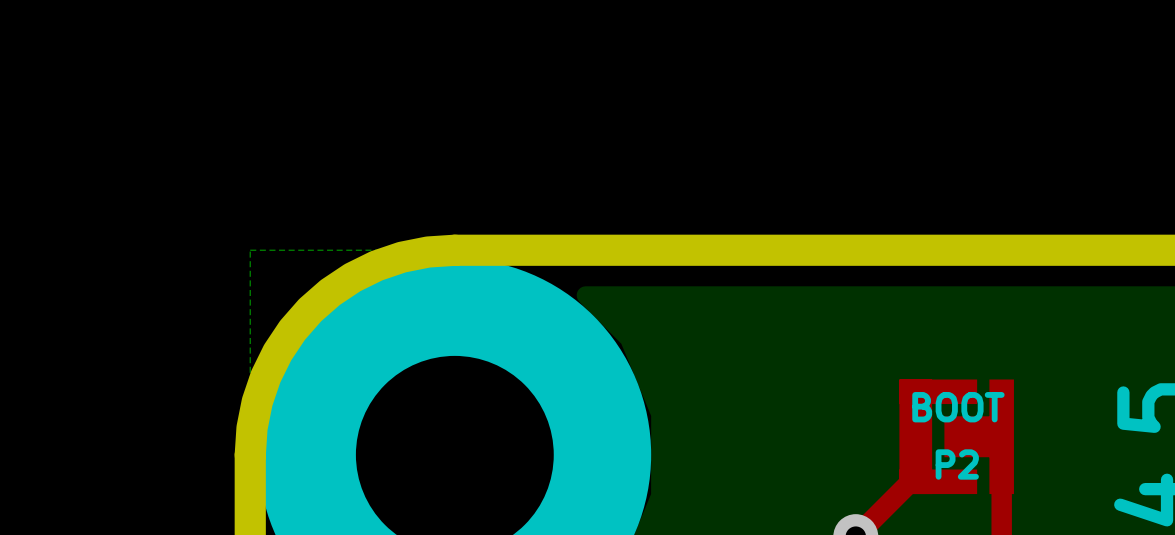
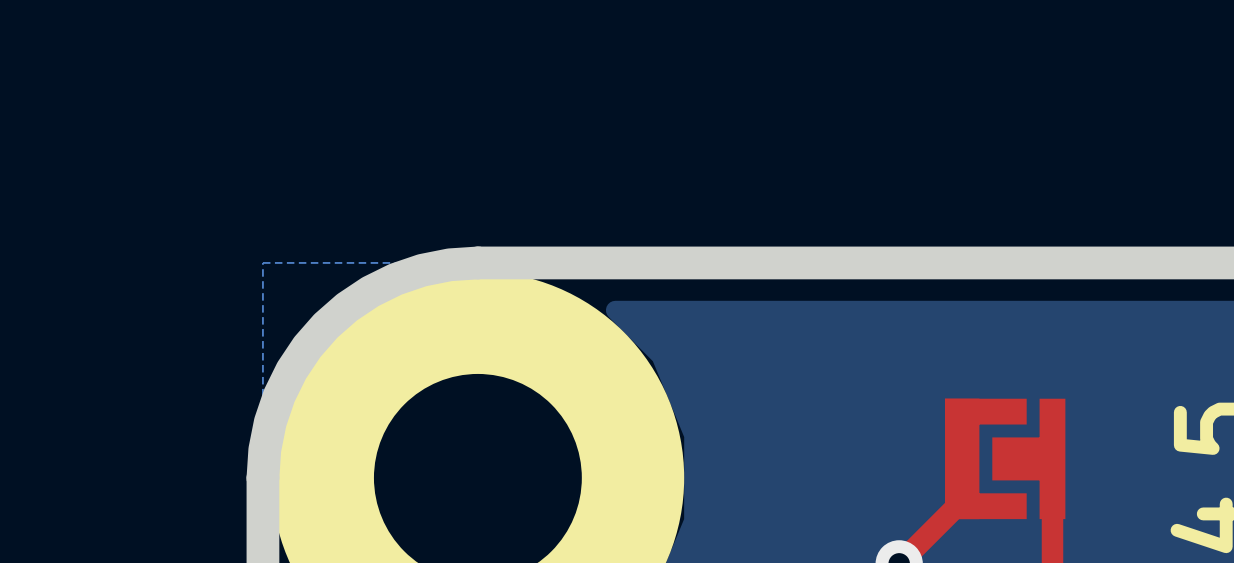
P2 value: BOOT (958, 407) -> none
P2 name: P2 (957, 464) -> none

